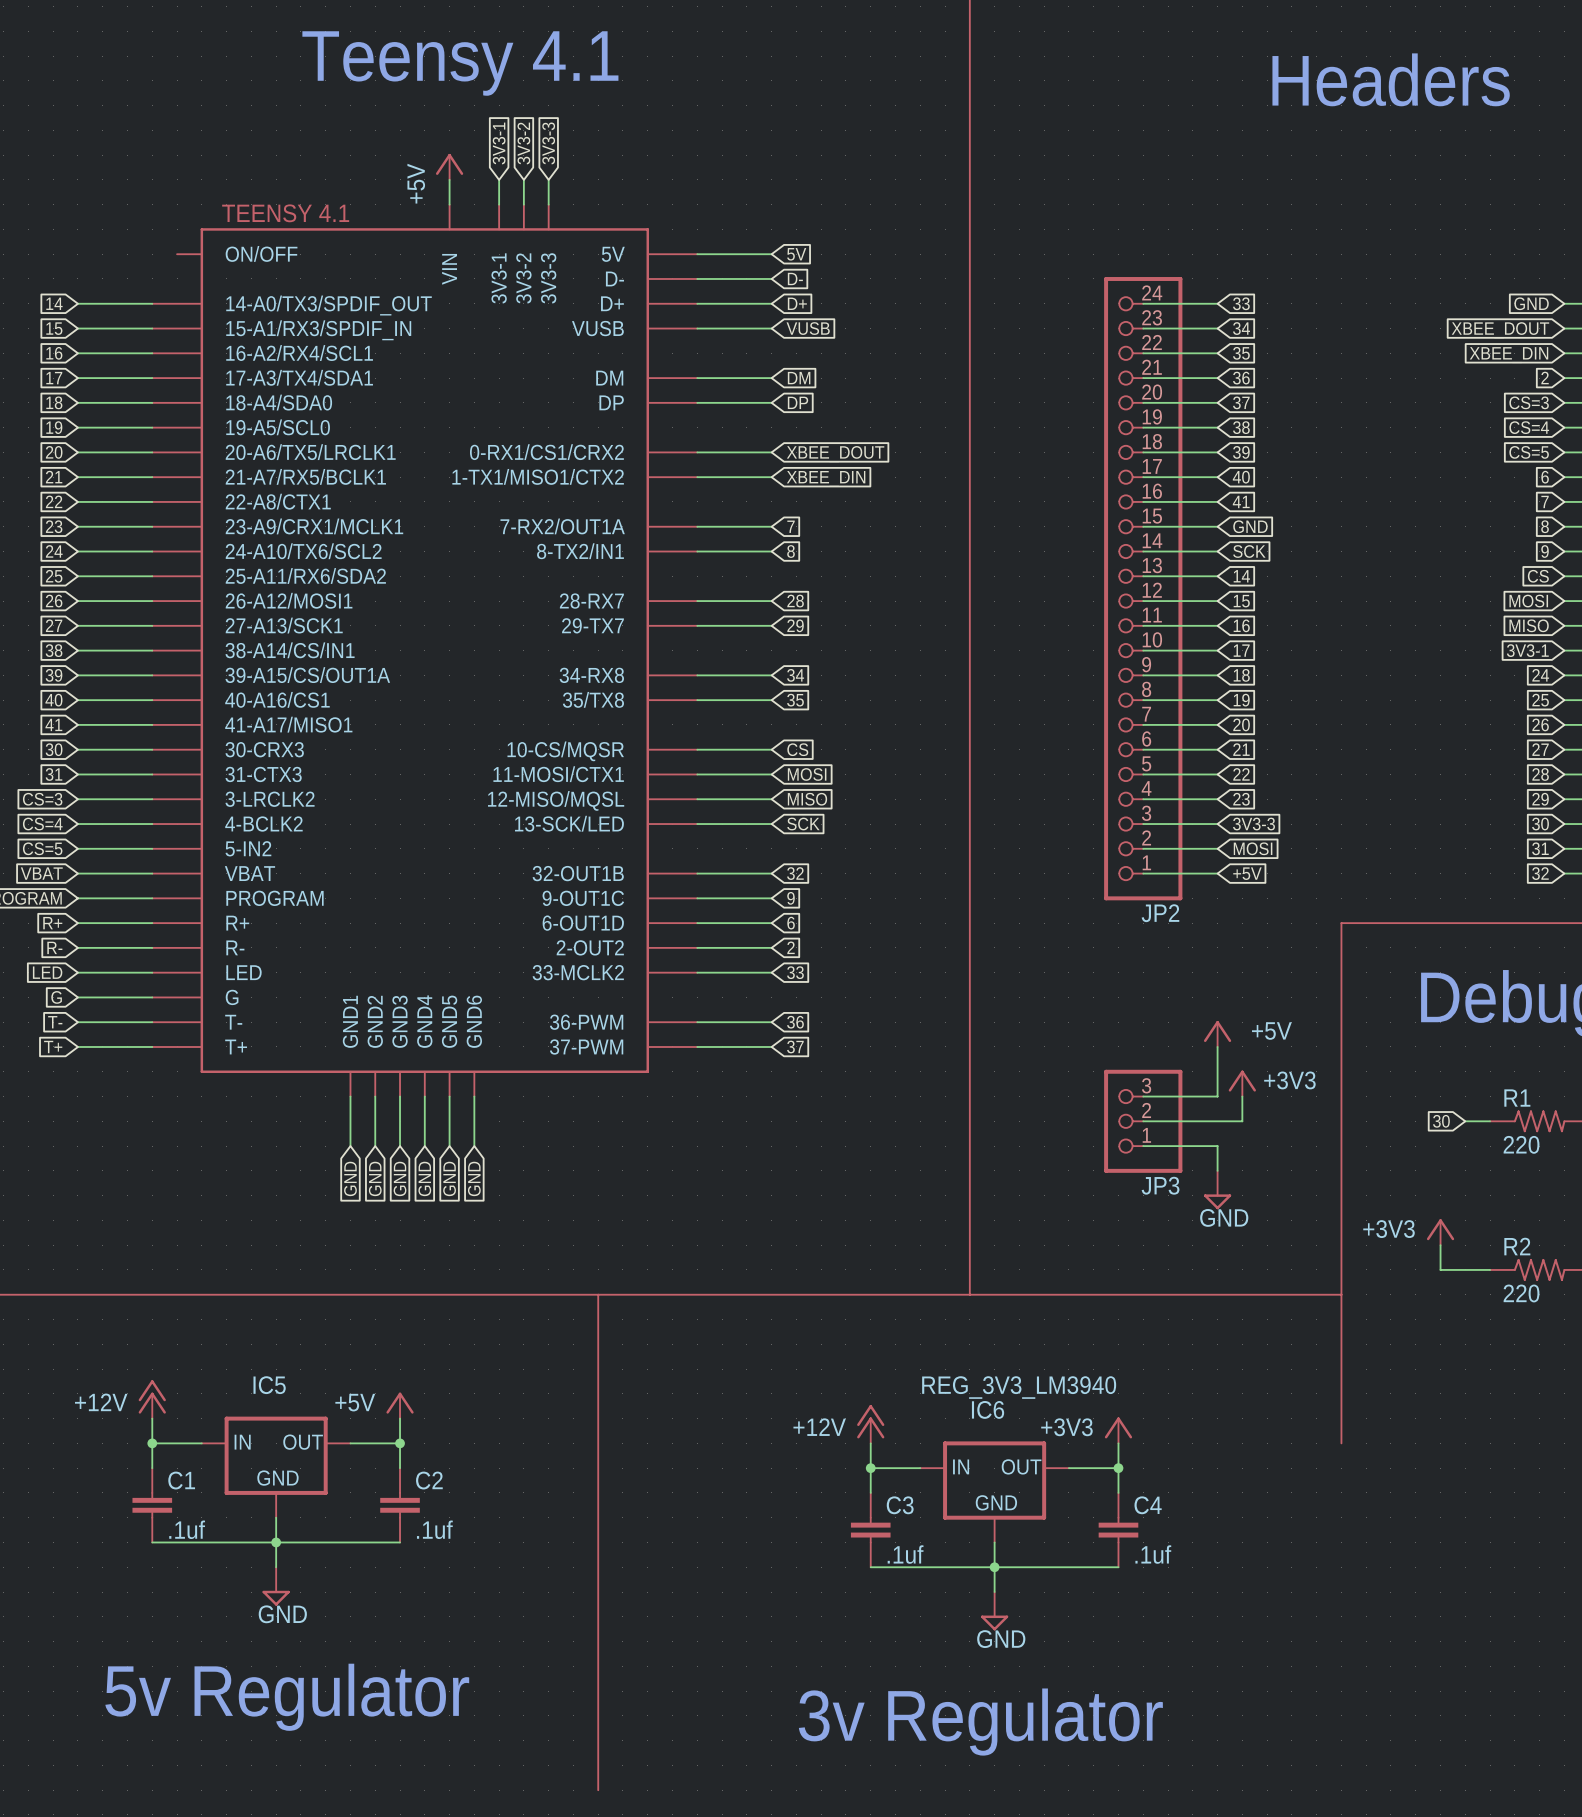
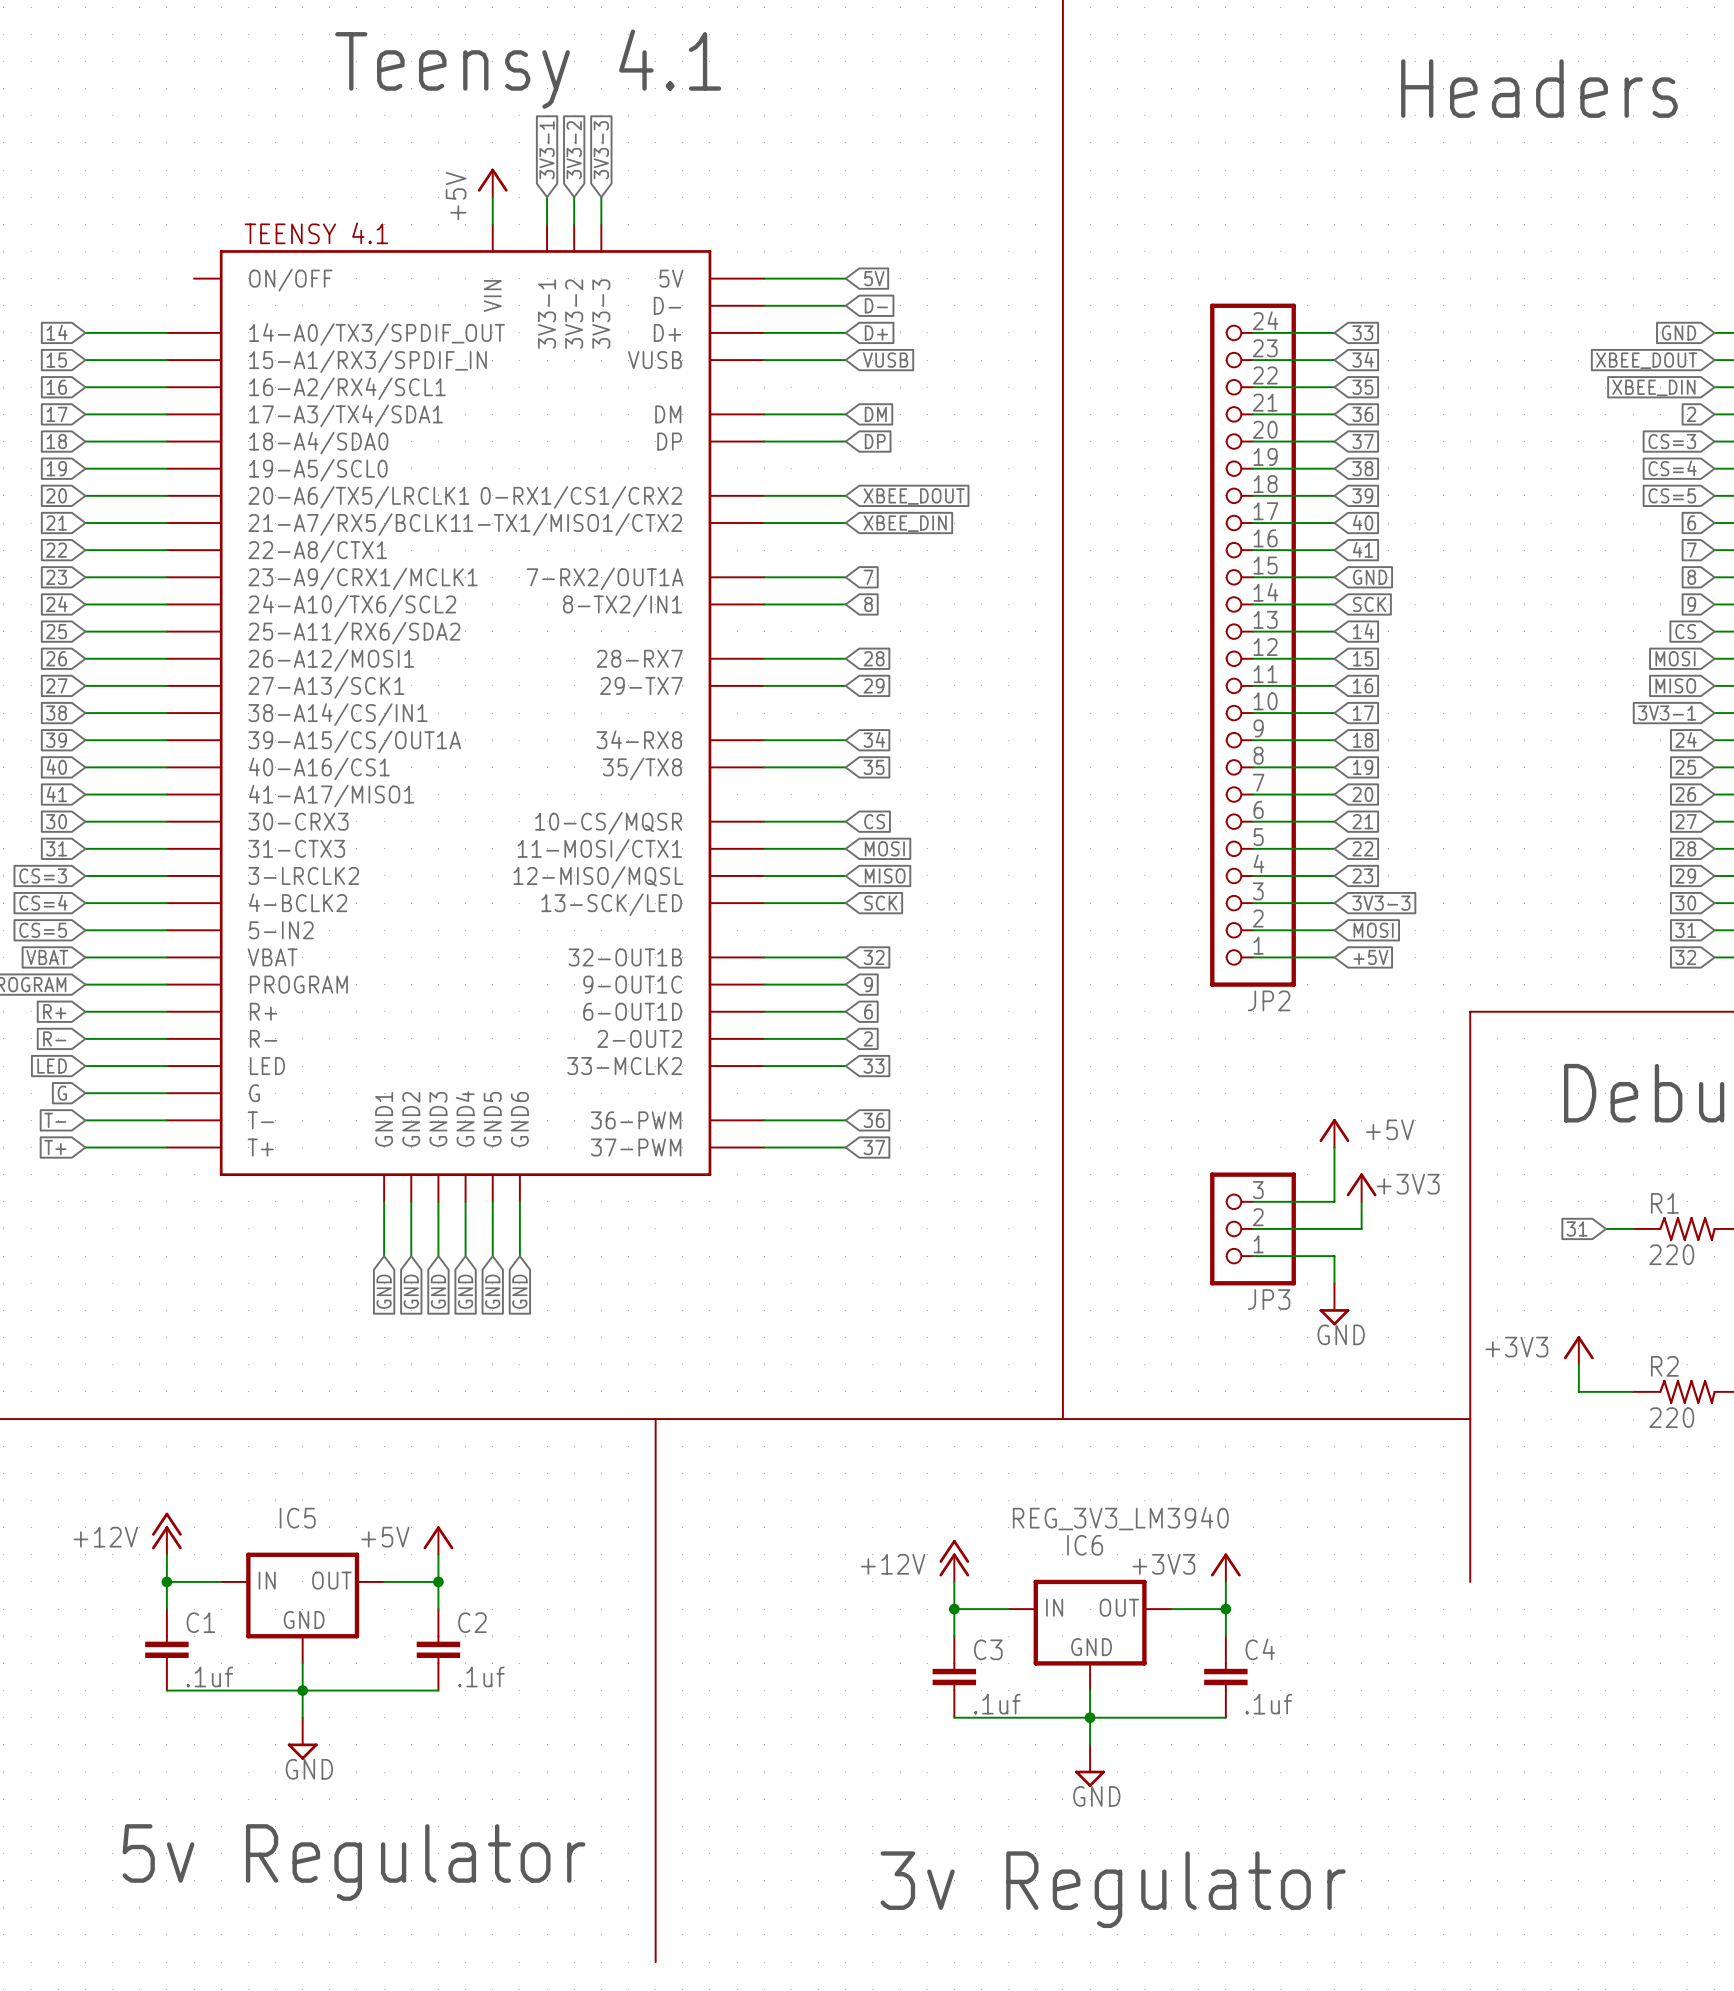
global label: 30 (1441, 1121) -> 31 (1577, 1228)

